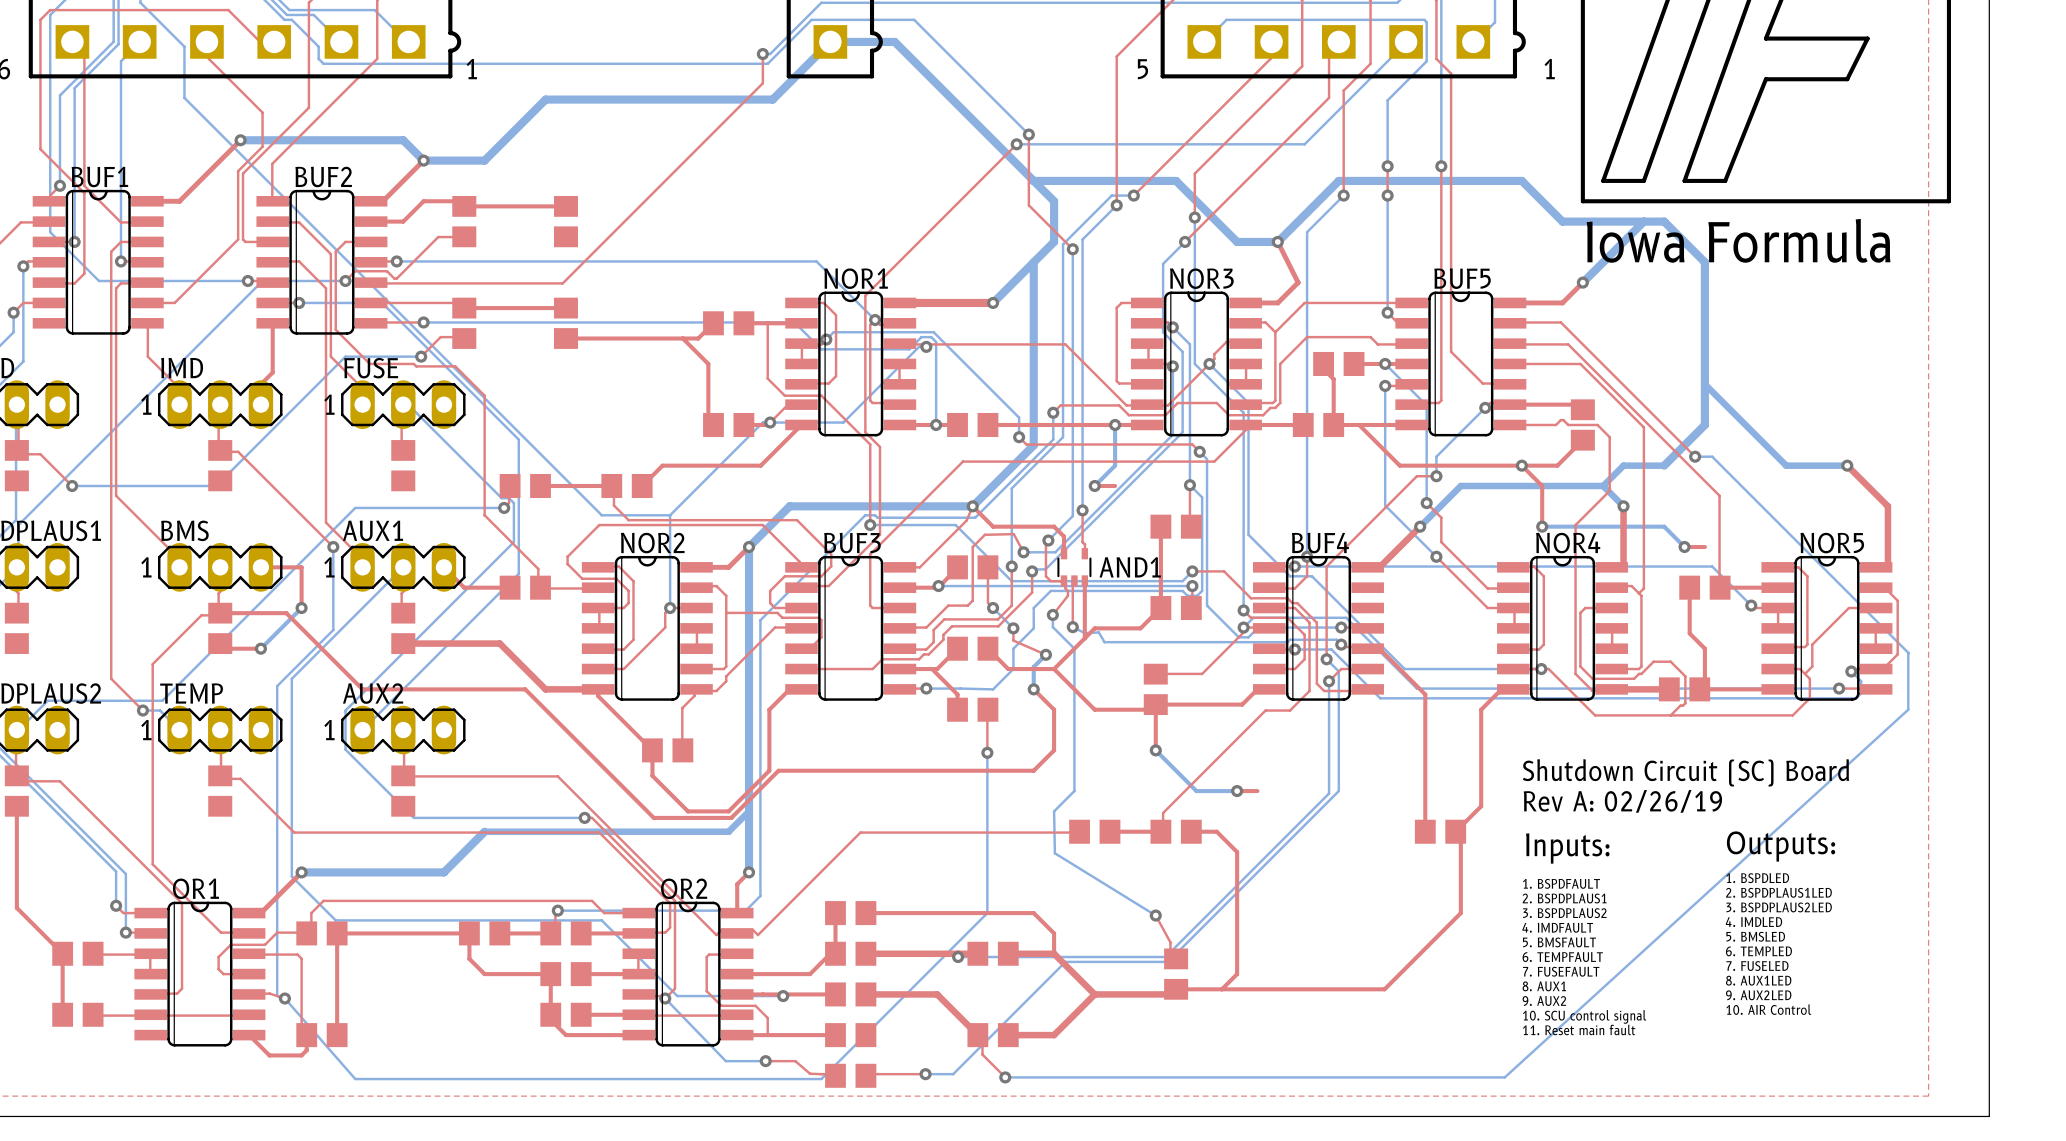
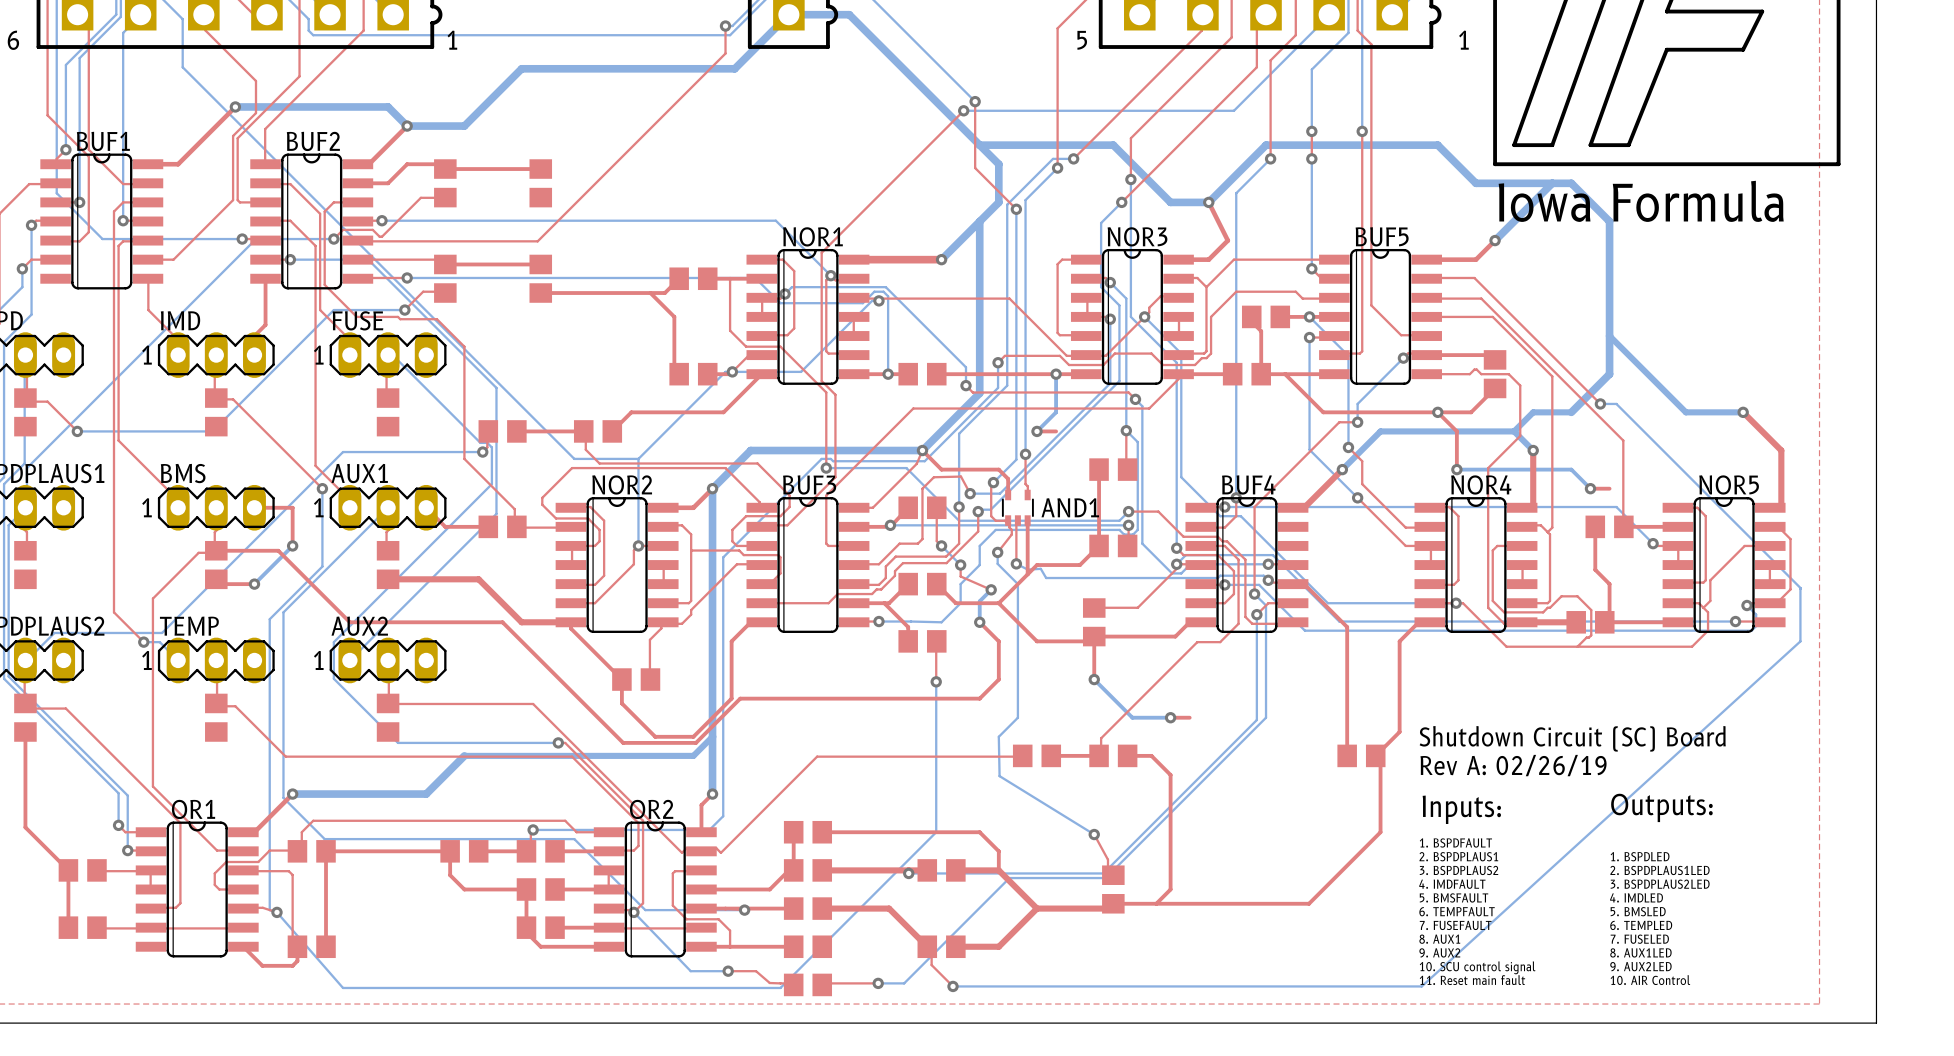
text position: Shutdown Circuit (SC) Board (1685, 772) -> Shutdown Circuit (SC) Board (1572, 738)
text position: Rev A: 02/26/19 (1622, 801) -> Rev A: 02/26/19 (1513, 765)
text position: Outputs: (1781, 846) -> Outputs: (1661, 807)
text position: Inputs: (1567, 848) -> Inputs: (1461, 809)
text position: 1. BSPDLED (1757, 878) -> 1. BSPDLED (1640, 856)
text position: 1. BSPDFAULT (1561, 883) -> 1. BSPDFAULT (1455, 842)
text position: 2. BSPDPLAUS1LED (1778, 892) -> 2. BSPDPLAUS1LED (1659, 870)
text position: 2. BSPDPLAUS1 (1564, 898) -> 2. BSPDPLAUS1 (1458, 856)
text position: 3. BSPDPLAUS2LED (1779, 907) -> 3. BSPDPLAUS2LED (1660, 884)
text position: 3. BSPDPLAUS2 (1564, 913) -> 3. BSPDPLAUS2 (1459, 870)
text position: 4. IMDLED (1753, 922) -> 4. IMDLED (1636, 897)
text position: 4. IMDFAULT (1557, 927) -> 4. IMDFAULT (1452, 884)
text position: 5. BMSLED (1755, 936) -> 5. BMSLED (1638, 911)
text position: 5. BMSFAULT (1559, 942) -> 5. BMSFAULT (1454, 897)
text position: 6. TEMPLED (1758, 951) -> 6. TEMPLED (1641, 925)
text position: 6. TEMPFAULT (1562, 957) -> 6. TEMPFAULT (1457, 911)
text position: 7. FUSELED (1757, 966) -> 7. FUSELED (1639, 939)
text position: 7. FUSEFAULT (1561, 971) -> 7. FUSEFAULT (1455, 925)
text position: 8. AUX1LED (1758, 980) -> 8. AUX1LED (1640, 952)
text position: 8. AUX1 (1544, 986) -> 8. AUX1 (1439, 939)
text position: 9. AUX2LED (1758, 995) -> 9. AUX2LED (1640, 966)
text position: 9. AUX2 (1544, 1001) -> 9. AUX2 (1439, 952)
text position: 10. AIR Control (1768, 1009) -> 10. AIR Control (1650, 980)
text position: 10. SCU control signal (1584, 1016) -> 10. SCU control signal (1477, 967)
text position: 11. Reset main fault (1579, 1029) -> 11. Reset main fault (1472, 980)

